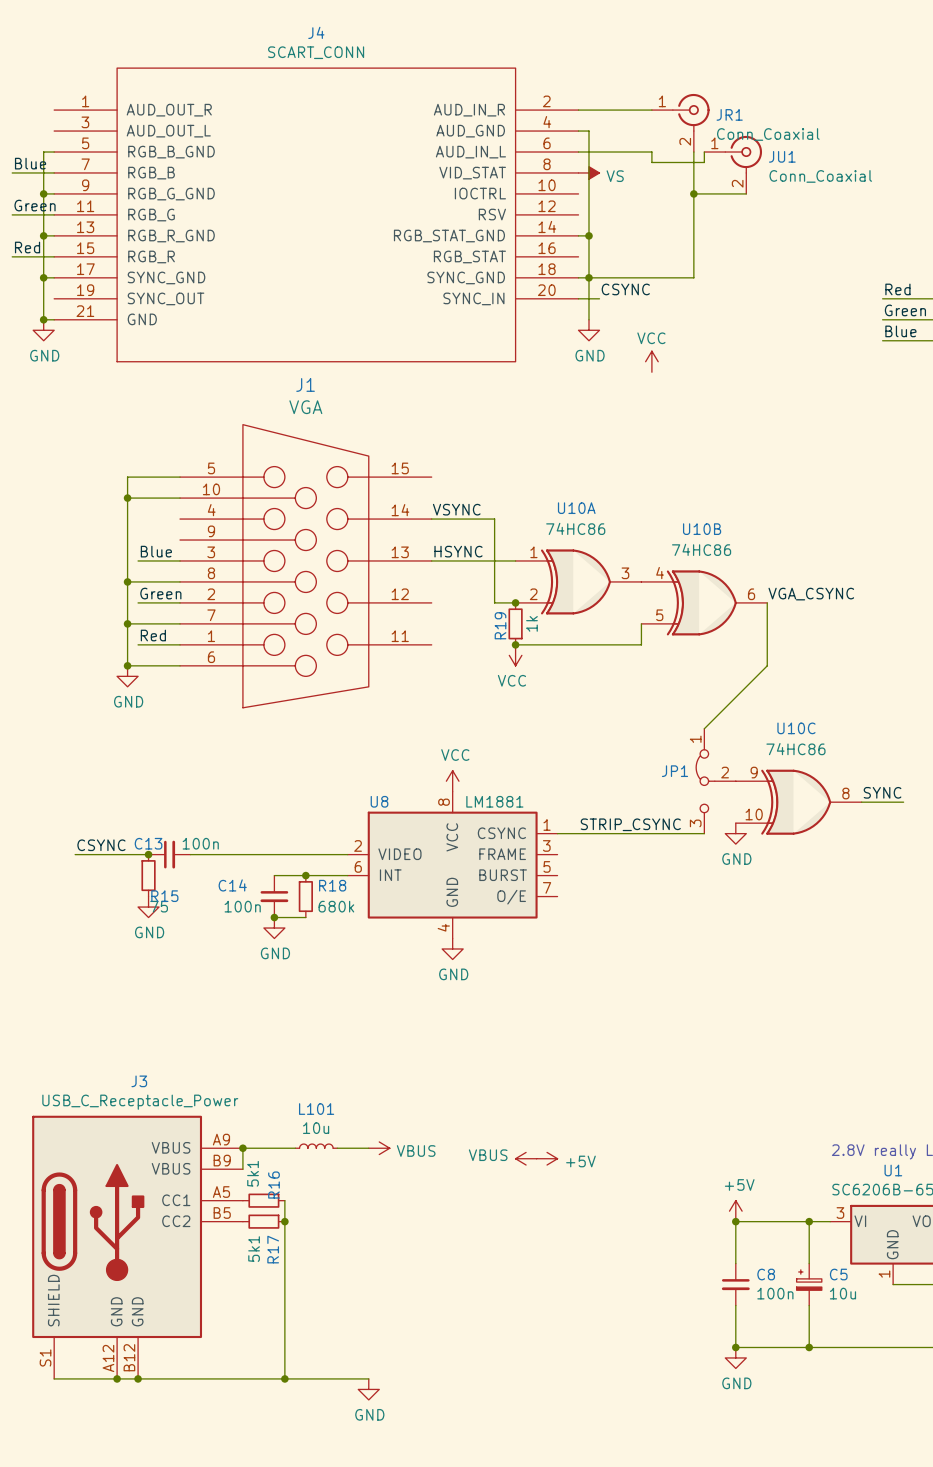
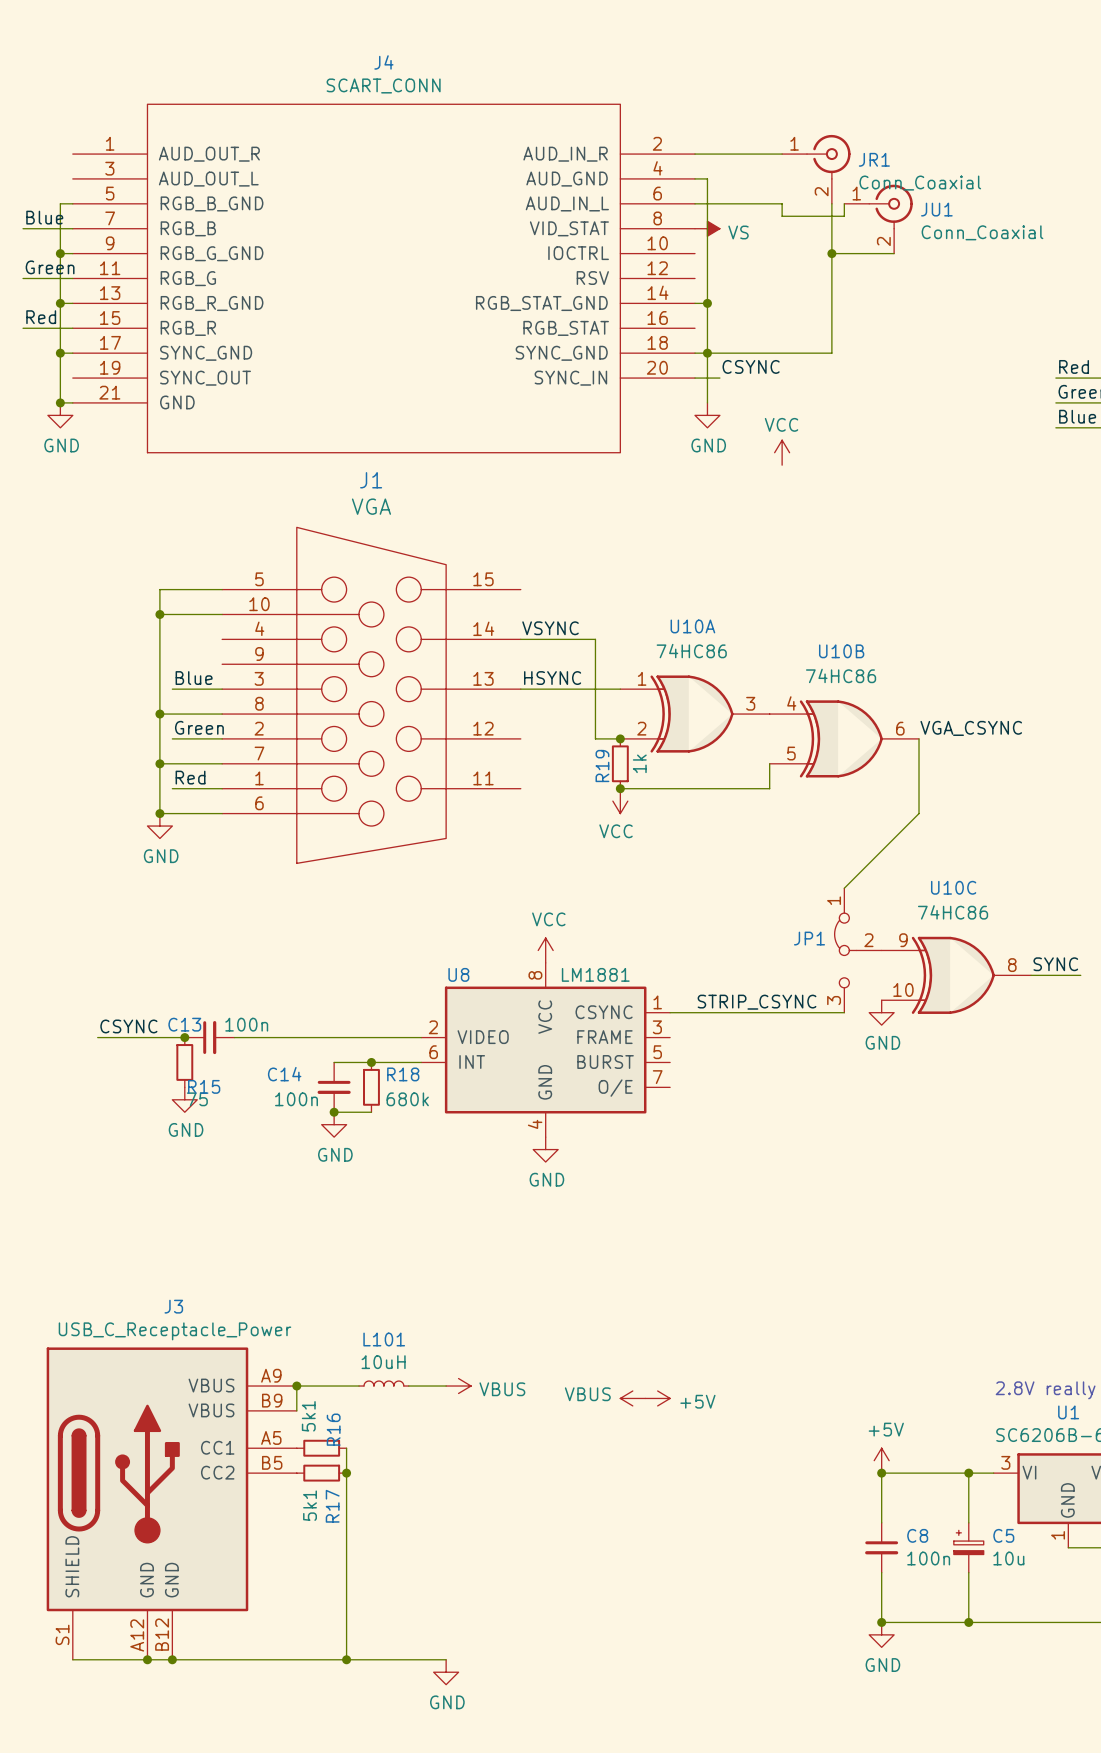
L101 value: 10u (316, 1128) -> 10uH (383, 1362)

